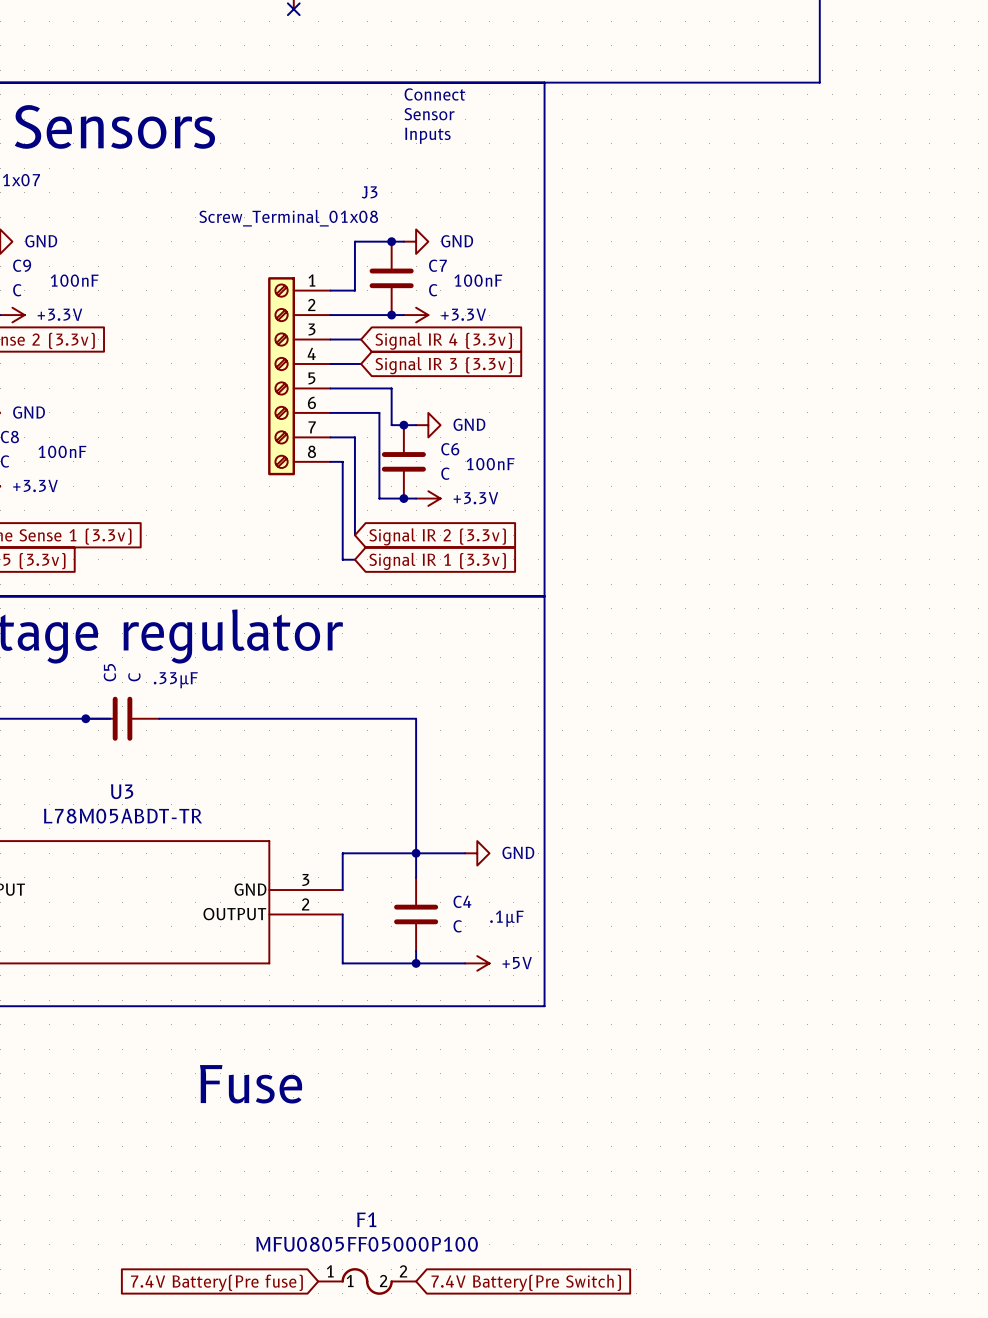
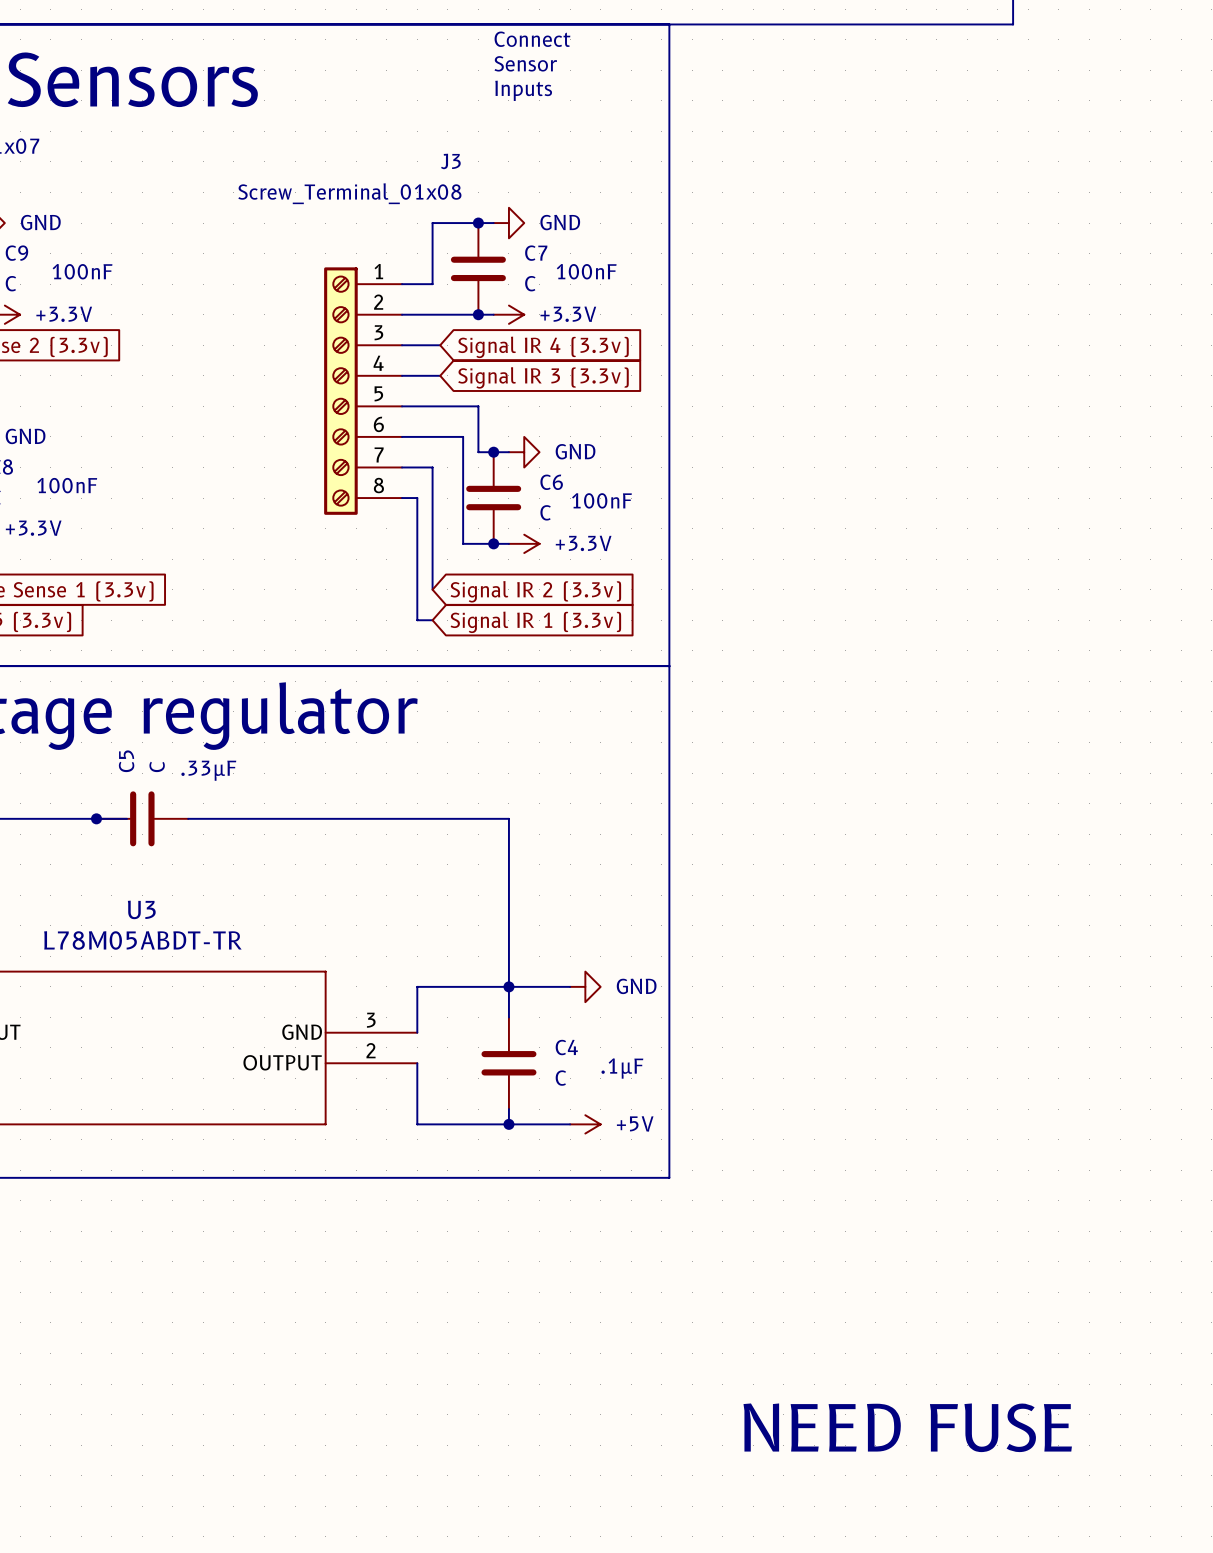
text: Fuse (251, 1084) -> none
text: none -> NEED FUSE (907, 1427)
F1: MFU0805FF05000P100 (367, 1281) -> none
global label: 7.4V Battery(Pre Switch) (526, 1282) -> none
global label: 7.4V Battery(Pre fuse) (216, 1283) -> none

